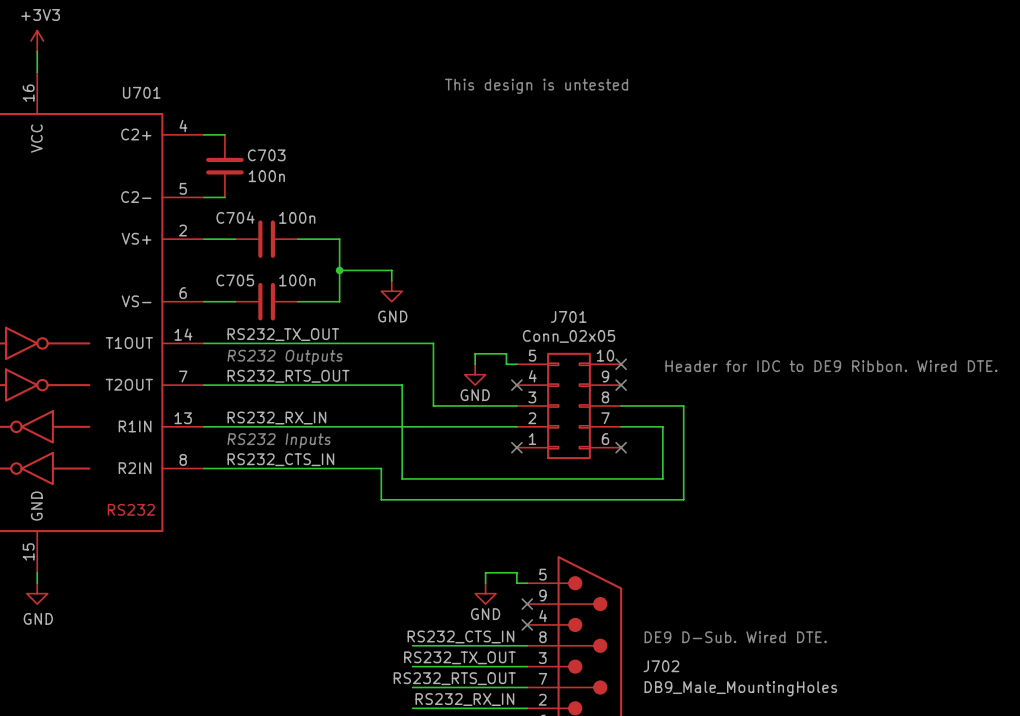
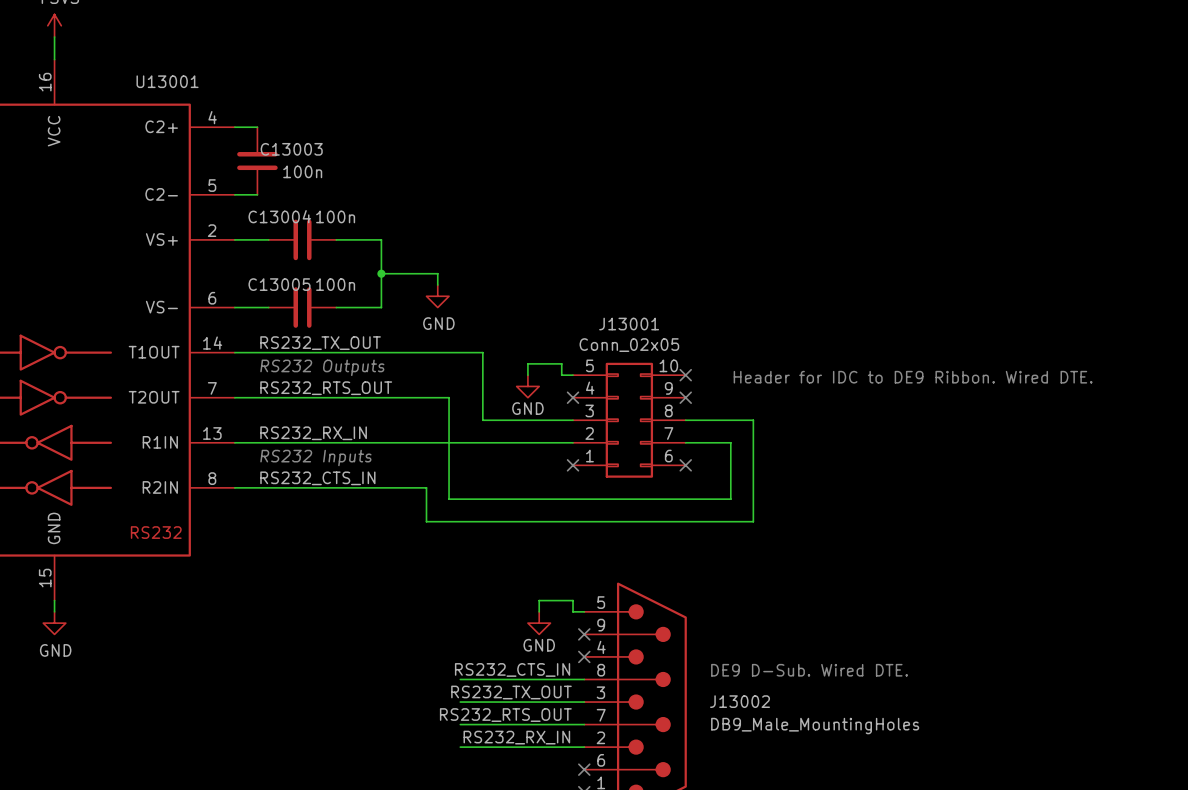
text: This design is untested (536, 86) -> none
U701 name: U701 (141, 92) -> U13001 (167, 81)
C703 name: C703 (266, 155) -> C13003 (291, 149)
C704 name: C704 (235, 217) -> C13004 (279, 216)
C705 name: C705 (235, 280) -> C13005 (279, 284)
J701 name: J701 (568, 316) -> J13001 (629, 324)
J702 name: J702 (661, 666) -> J13002 (740, 701)

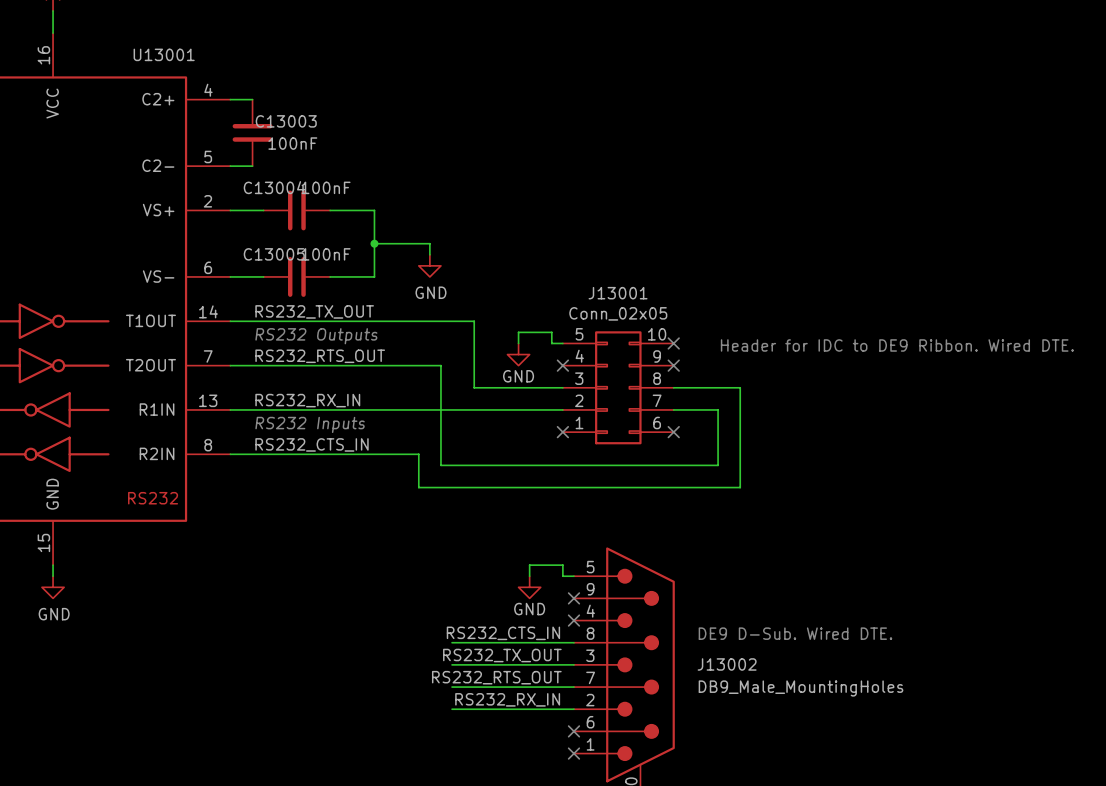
C13003 value: 100n (302, 171) -> 100nF (292, 143)
C13004 value: 100n (335, 216) -> 100nF (326, 187)
C13005 value: 100n (335, 284) -> 100nF (326, 254)

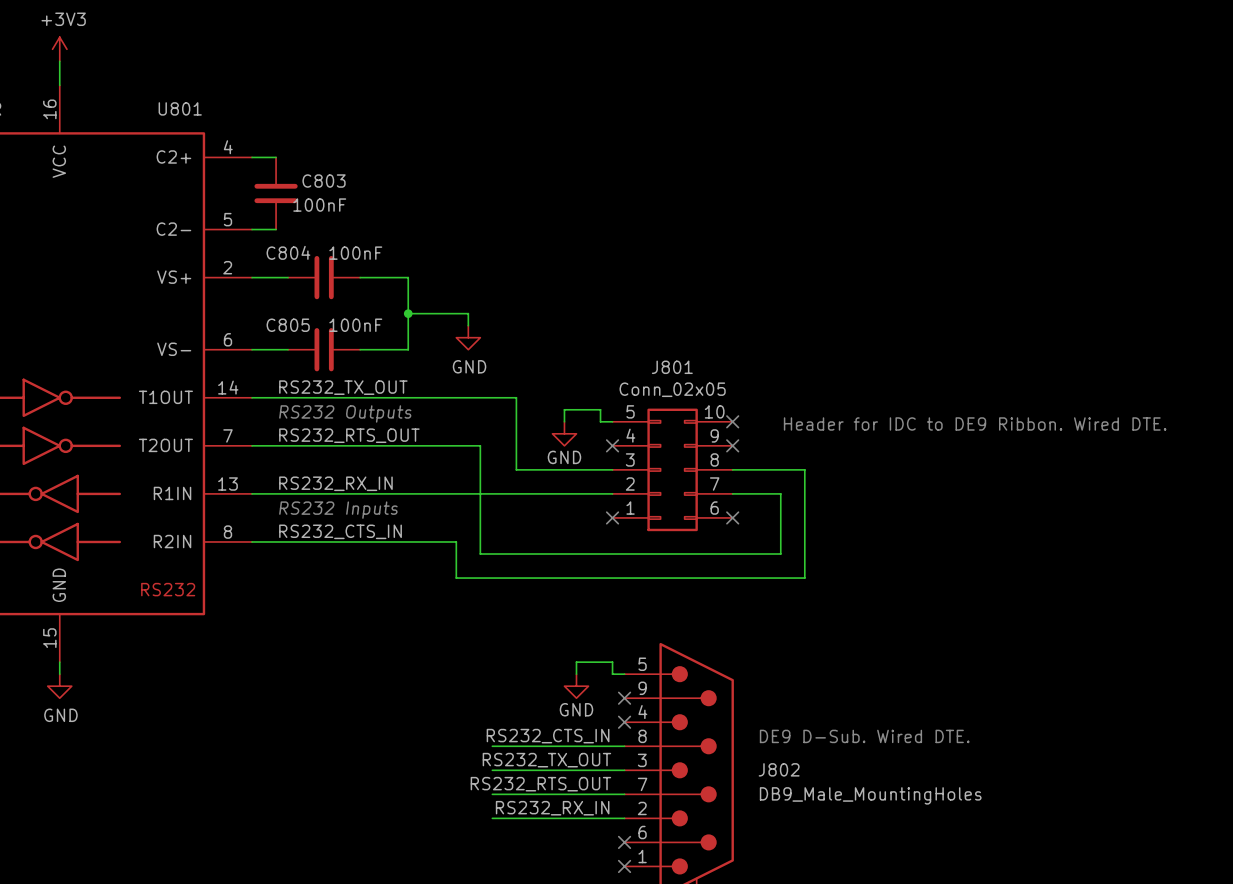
U13001 name: U13001 (164, 54) -> U801 (180, 108)
C13003 name: C13003 (286, 121) -> C803 (324, 181)
C13004 name: C13004 (274, 187) -> C804 (288, 252)
C13005 name: C13005 (274, 254) -> C805 (288, 325)
J13001 name: J13001 (618, 293) -> J801 (672, 367)
J13002 name: J13002 (727, 664) -> J802 (779, 769)

